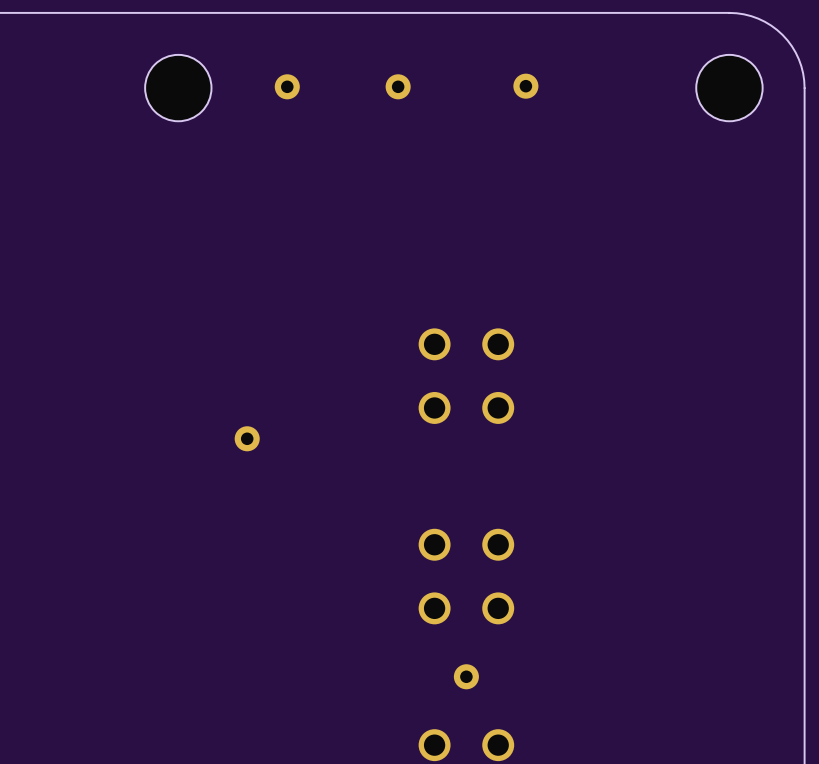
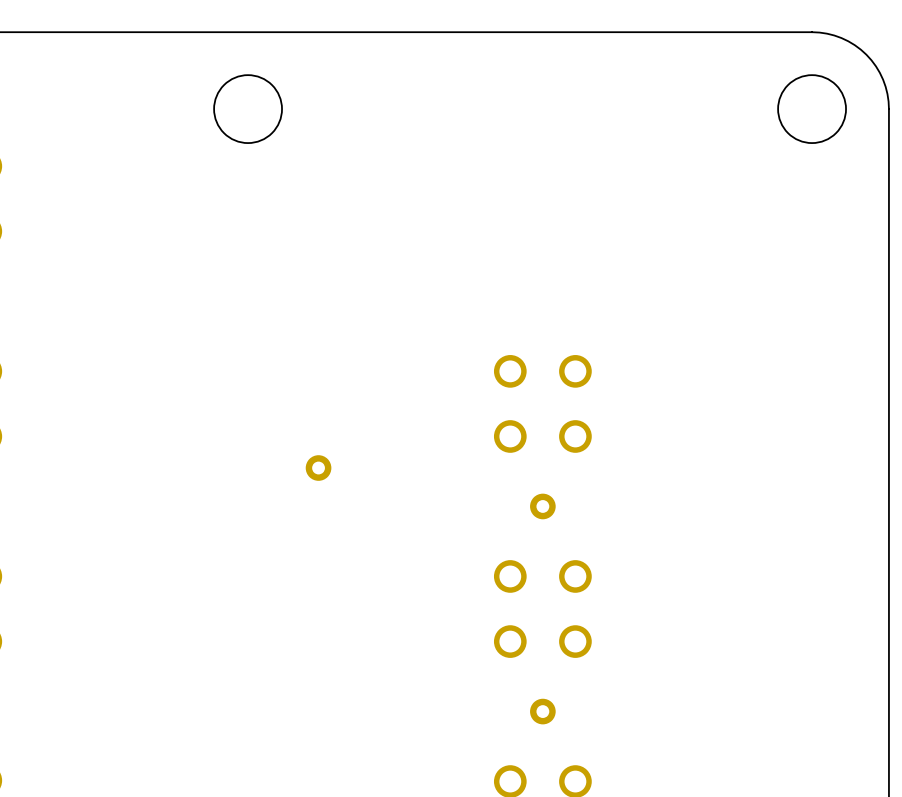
part: (287, 86) -> none
part: (398, 86) -> none
part: (525, 86) -> none
part: none -> (542, 506)

